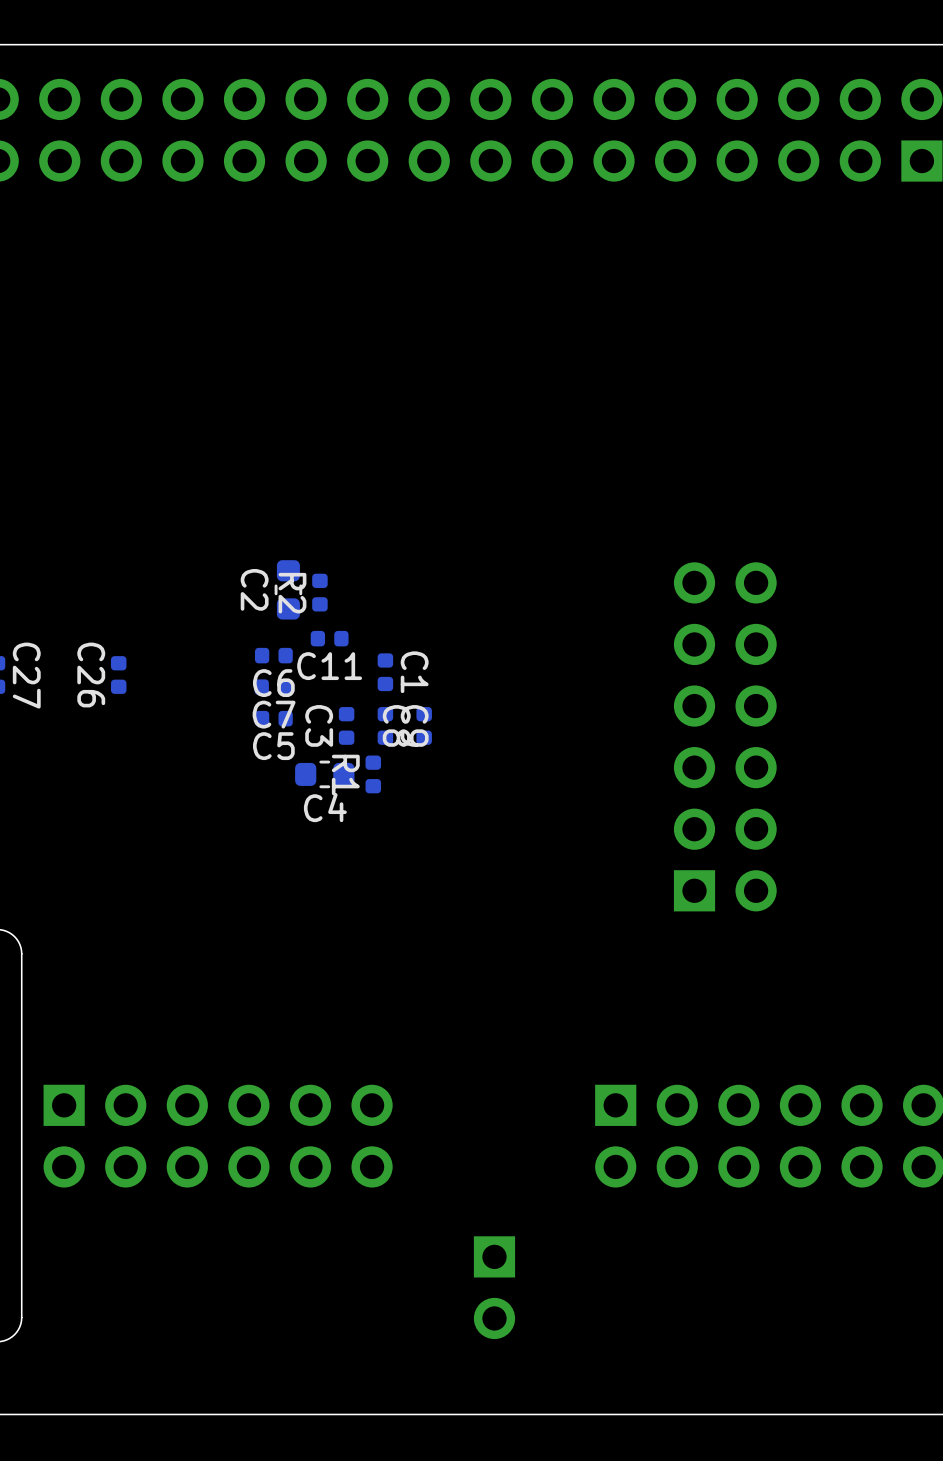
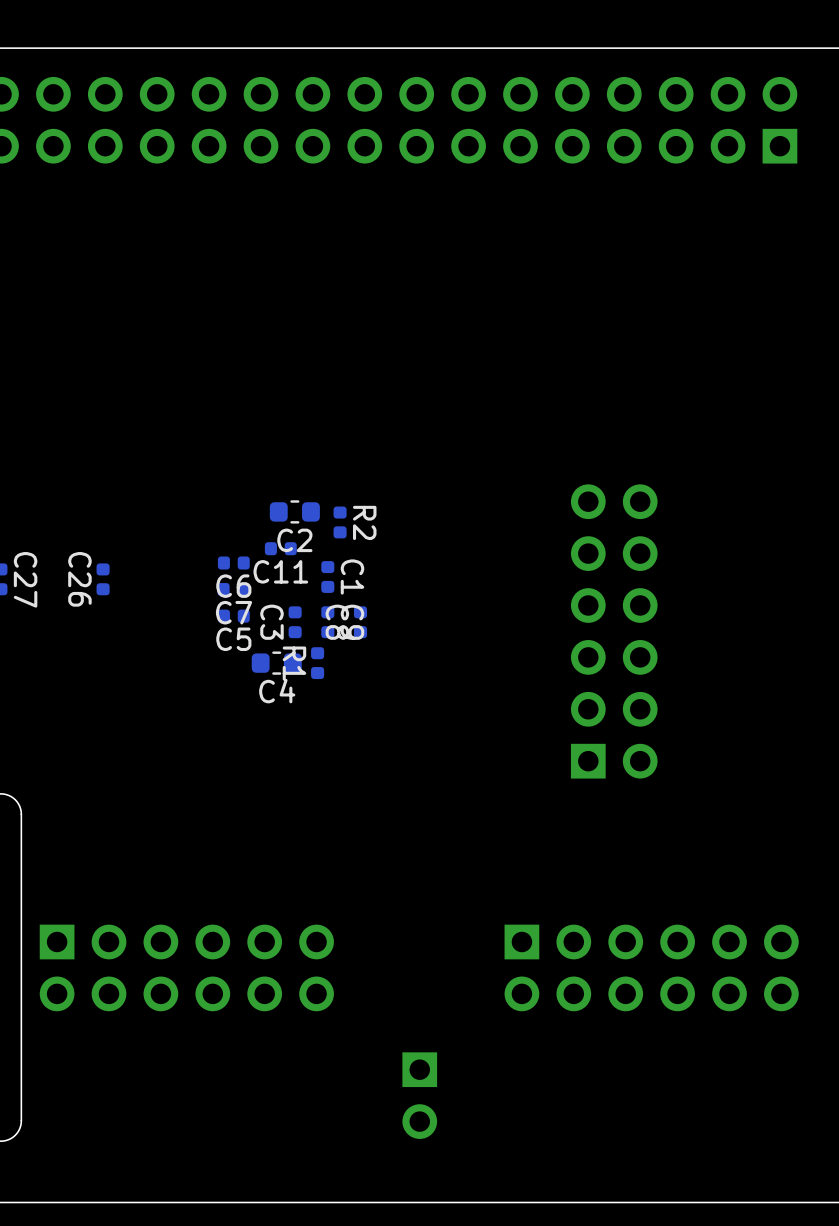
C2 name position: C2 (254, 589) -> C2 (294, 540)
C2 rotation: 0° (288, 589) -> 90° clockwise (294, 511)
C2 position: (288, 589) -> (294, 511)
R2 position: (319, 592) -> (340, 522)
R2 name position: R2 (292, 593) -> R2 (364, 522)

